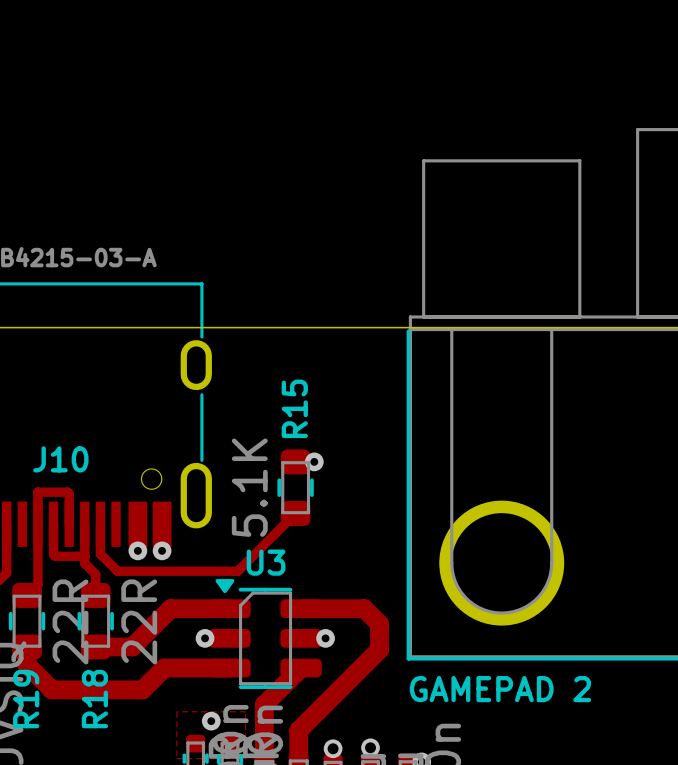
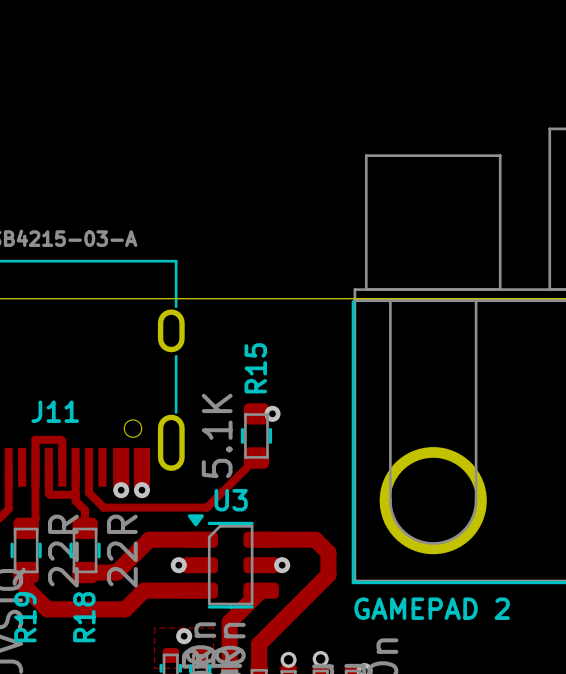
J10 name: J10 (60, 459) -> J11 (55, 411)

